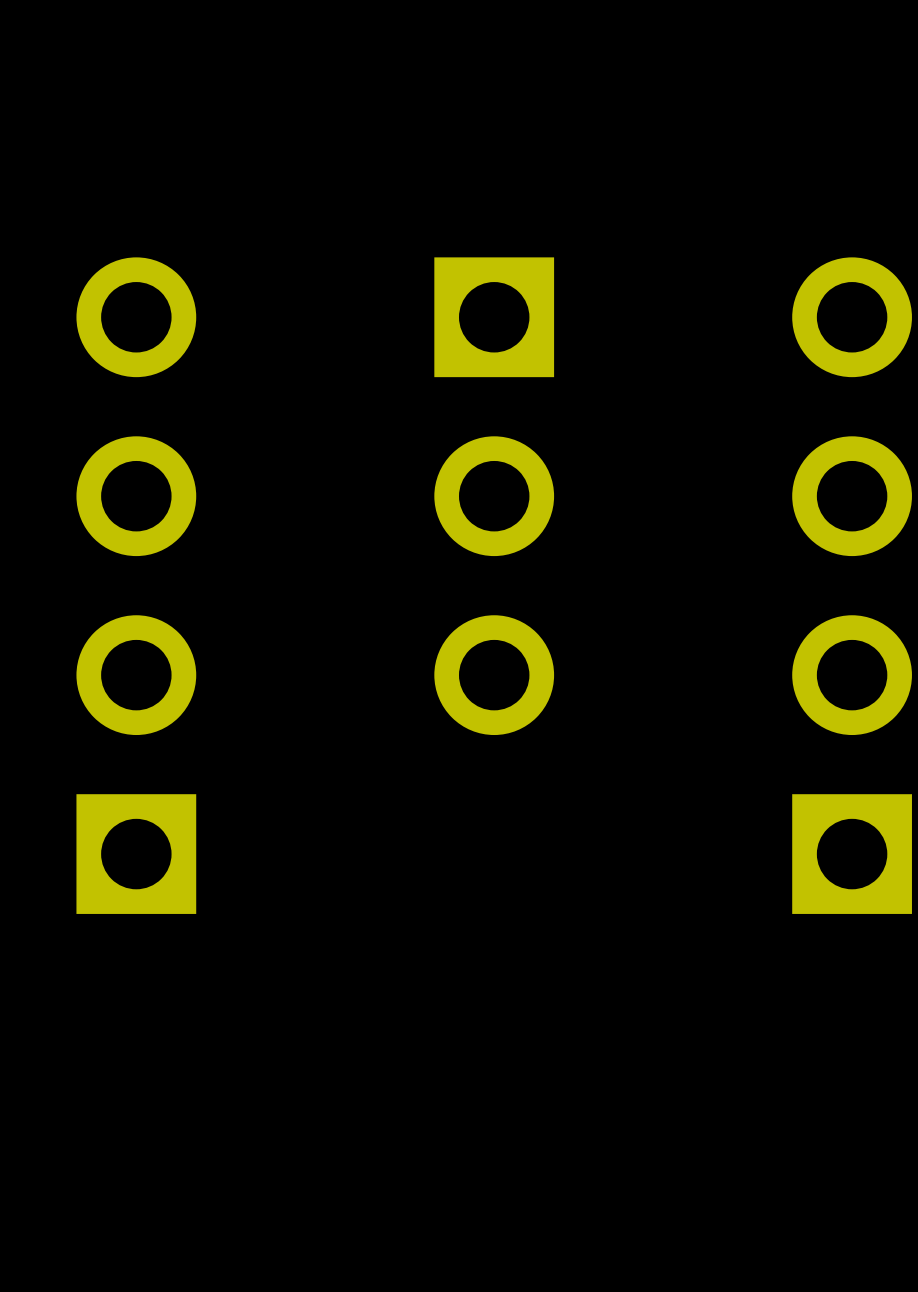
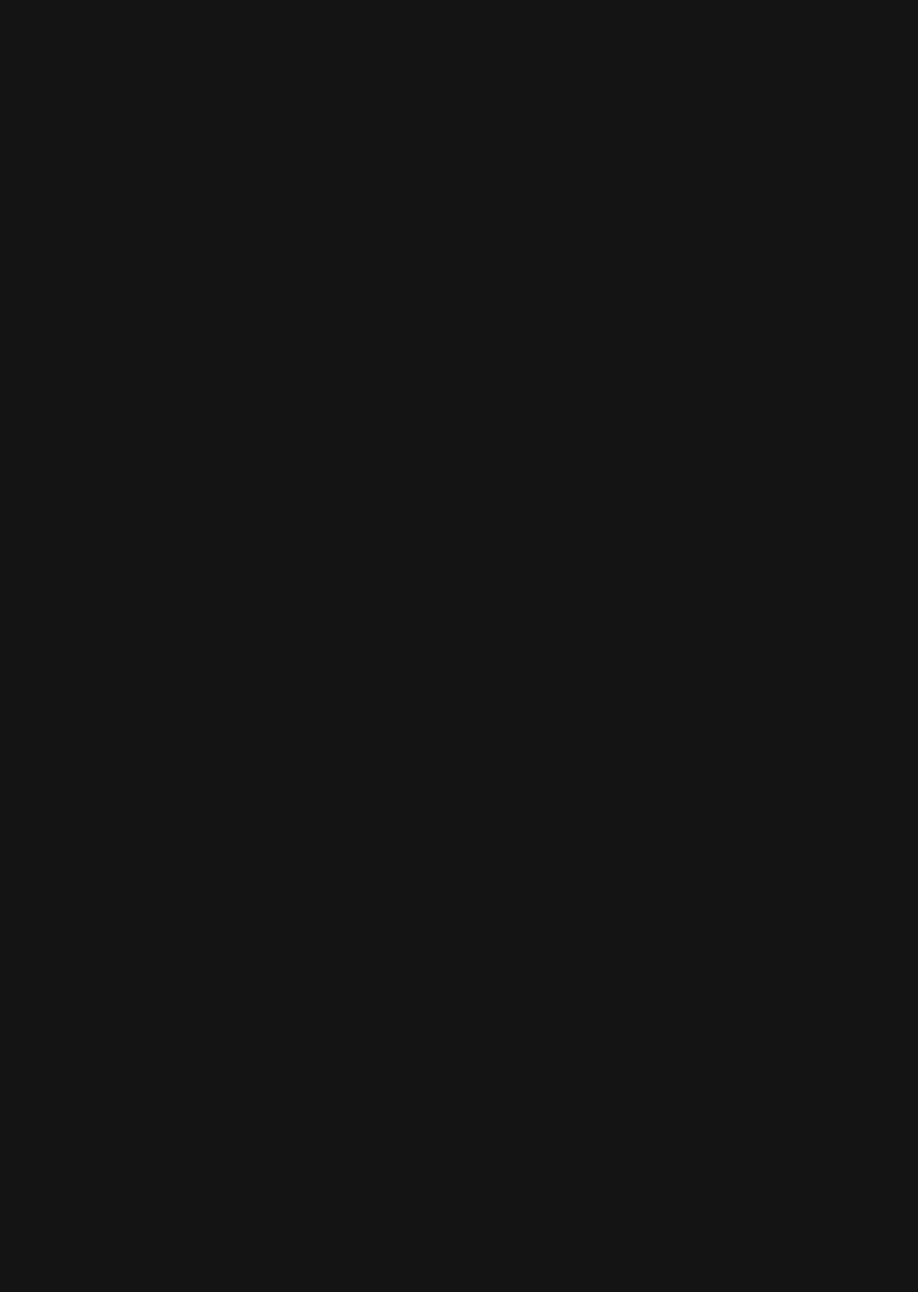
part: (494, 496) -> none
part: (136, 585) -> none
part: (852, 585) -> none

